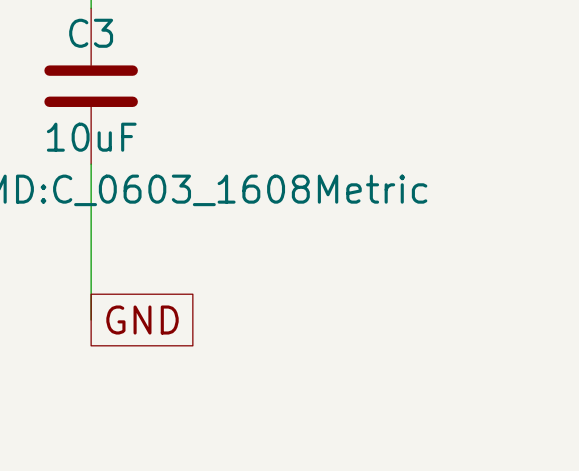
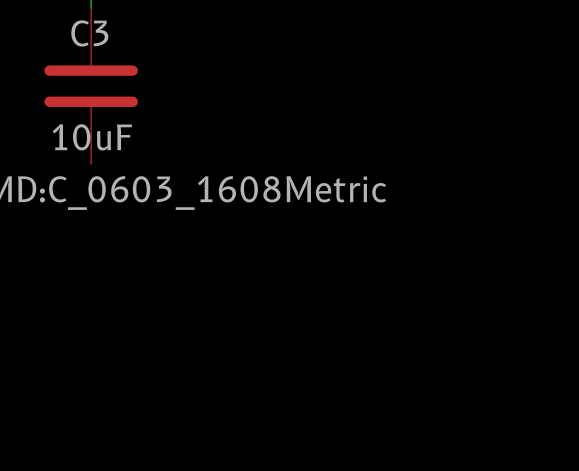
wire: (91, 164) (91, 320) -> none
global label: GND (142, 320) -> none

